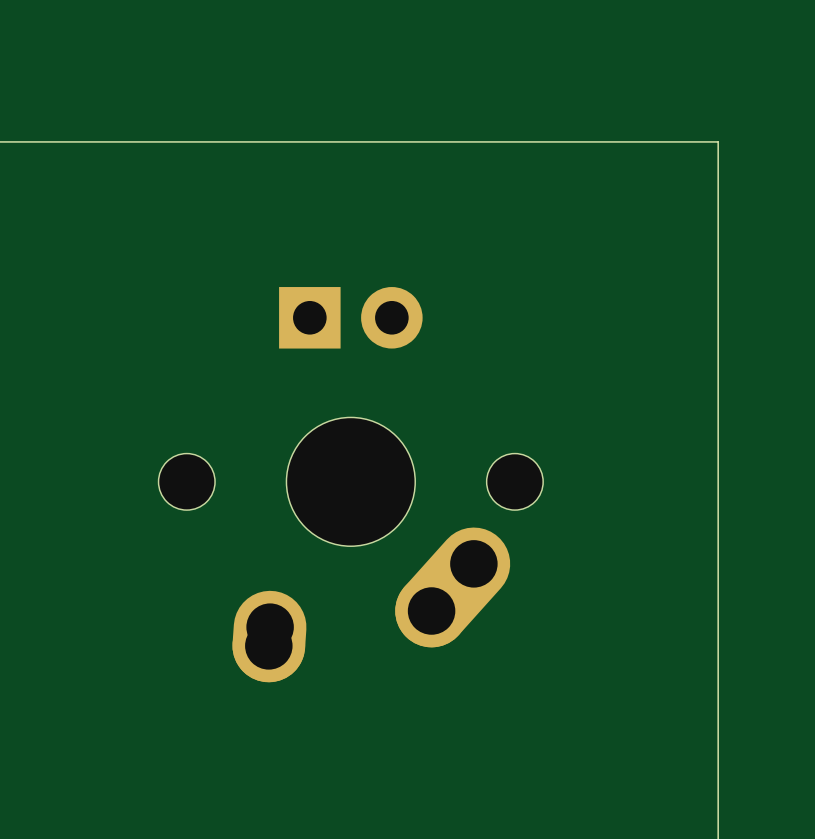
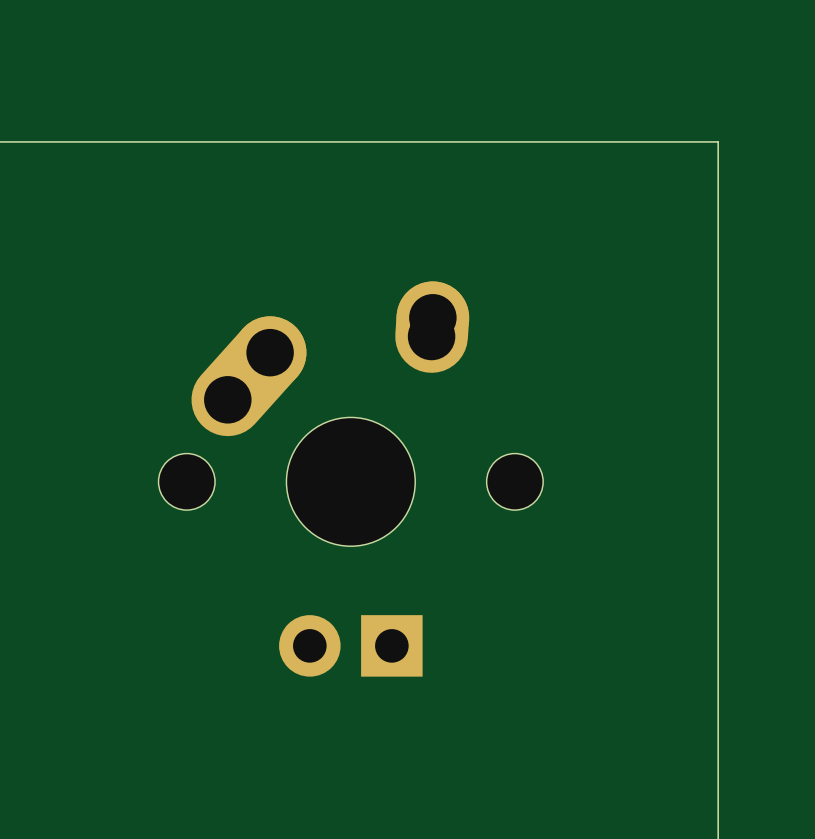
part rotation: 0° (350, 484) -> 180° (350, 479)

